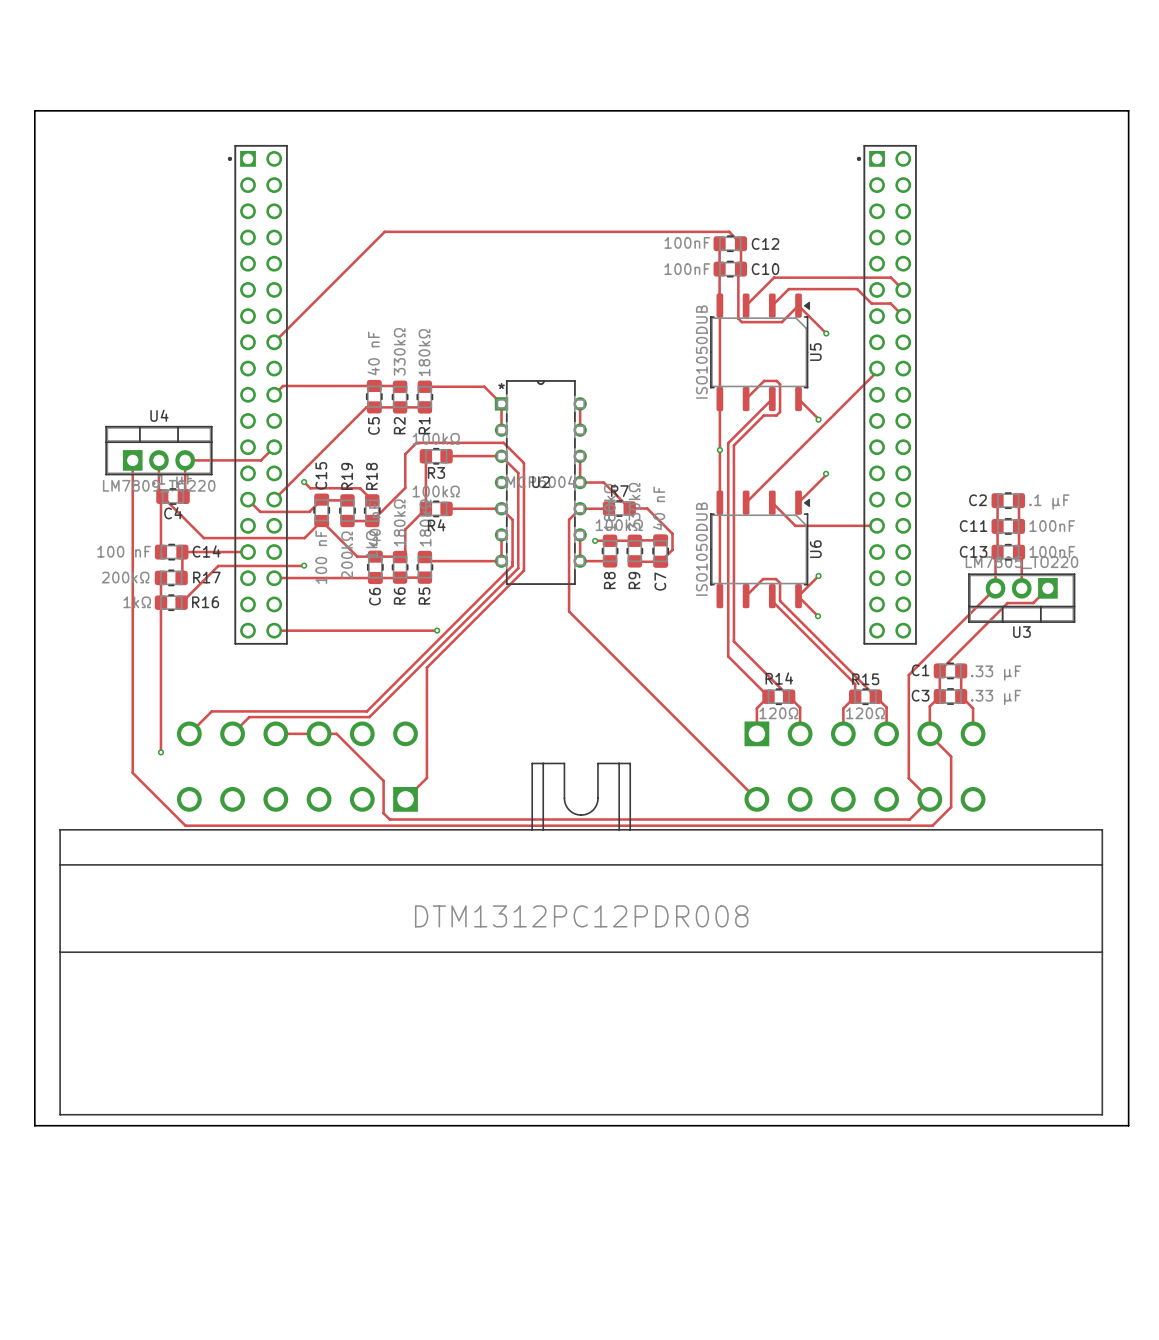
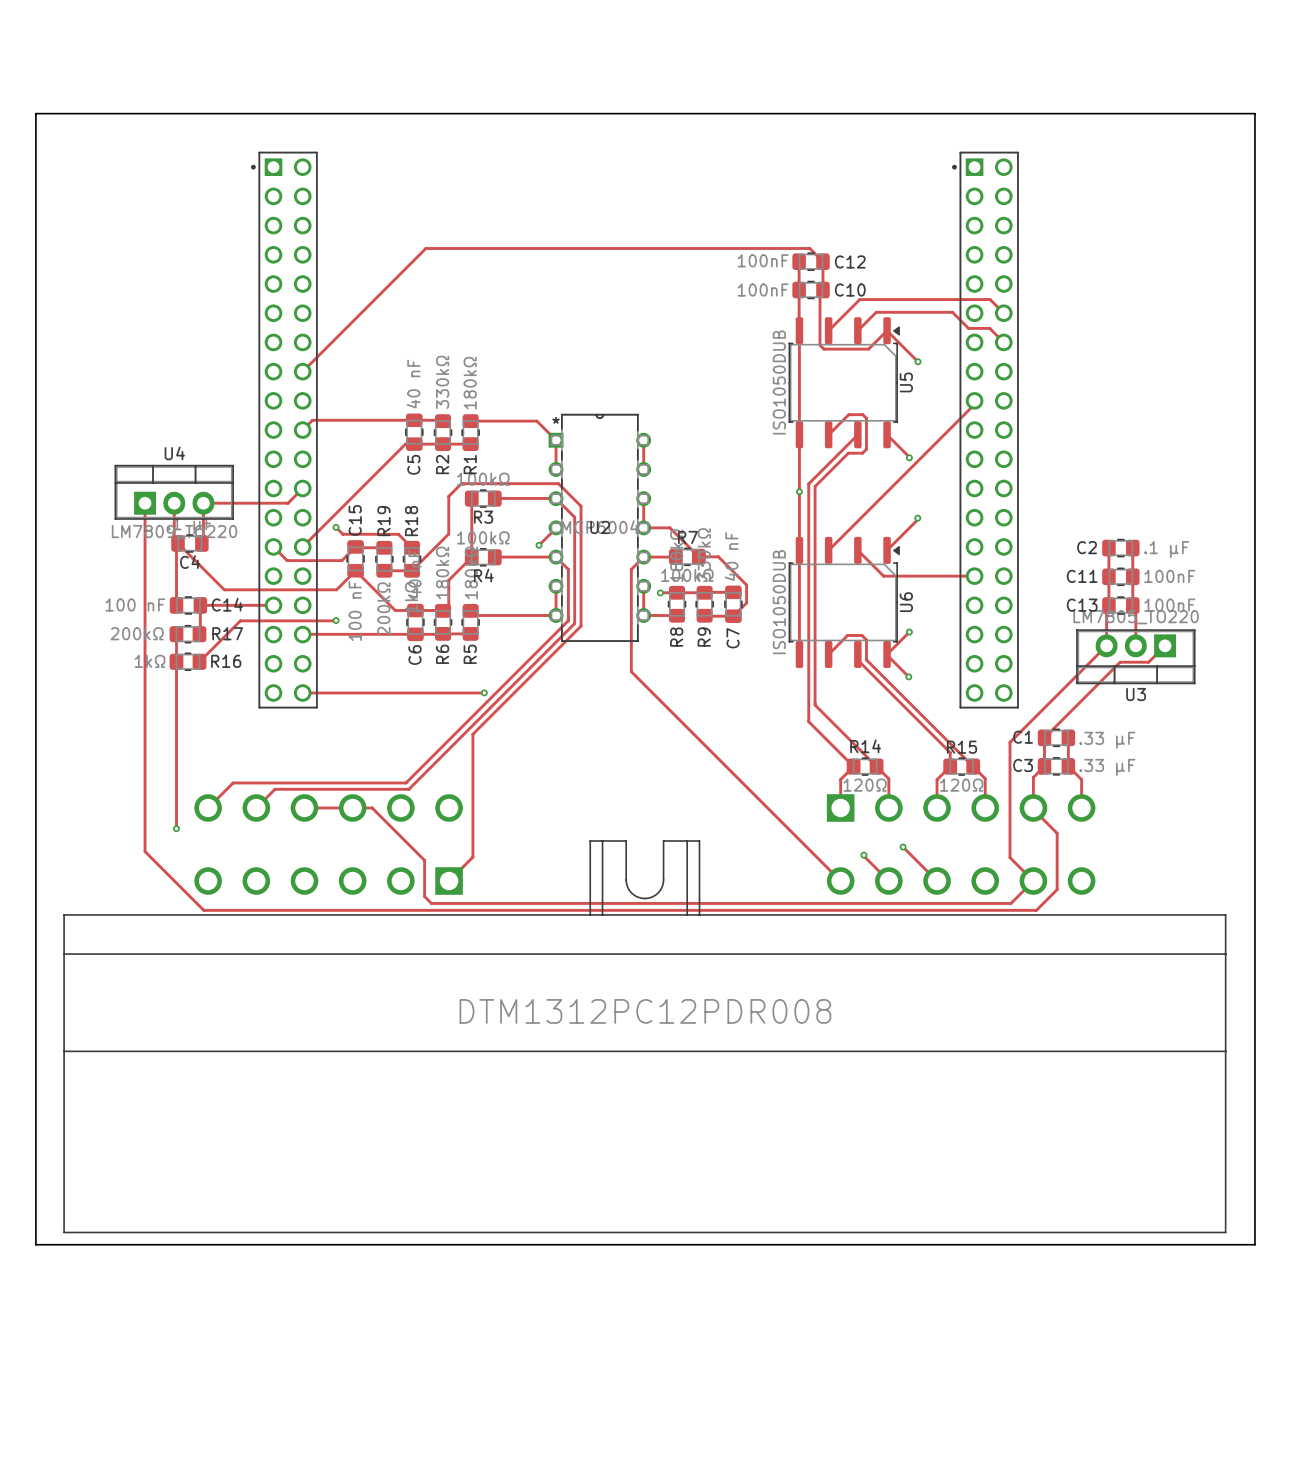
track: none -> (556, 528) (539, 545)
via: none -> (539, 545)
track: none -> (903, 847) (937, 881)
via: none -> (903, 847)
track: none -> (863, 855) (888, 881)
via: none -> (863, 855)

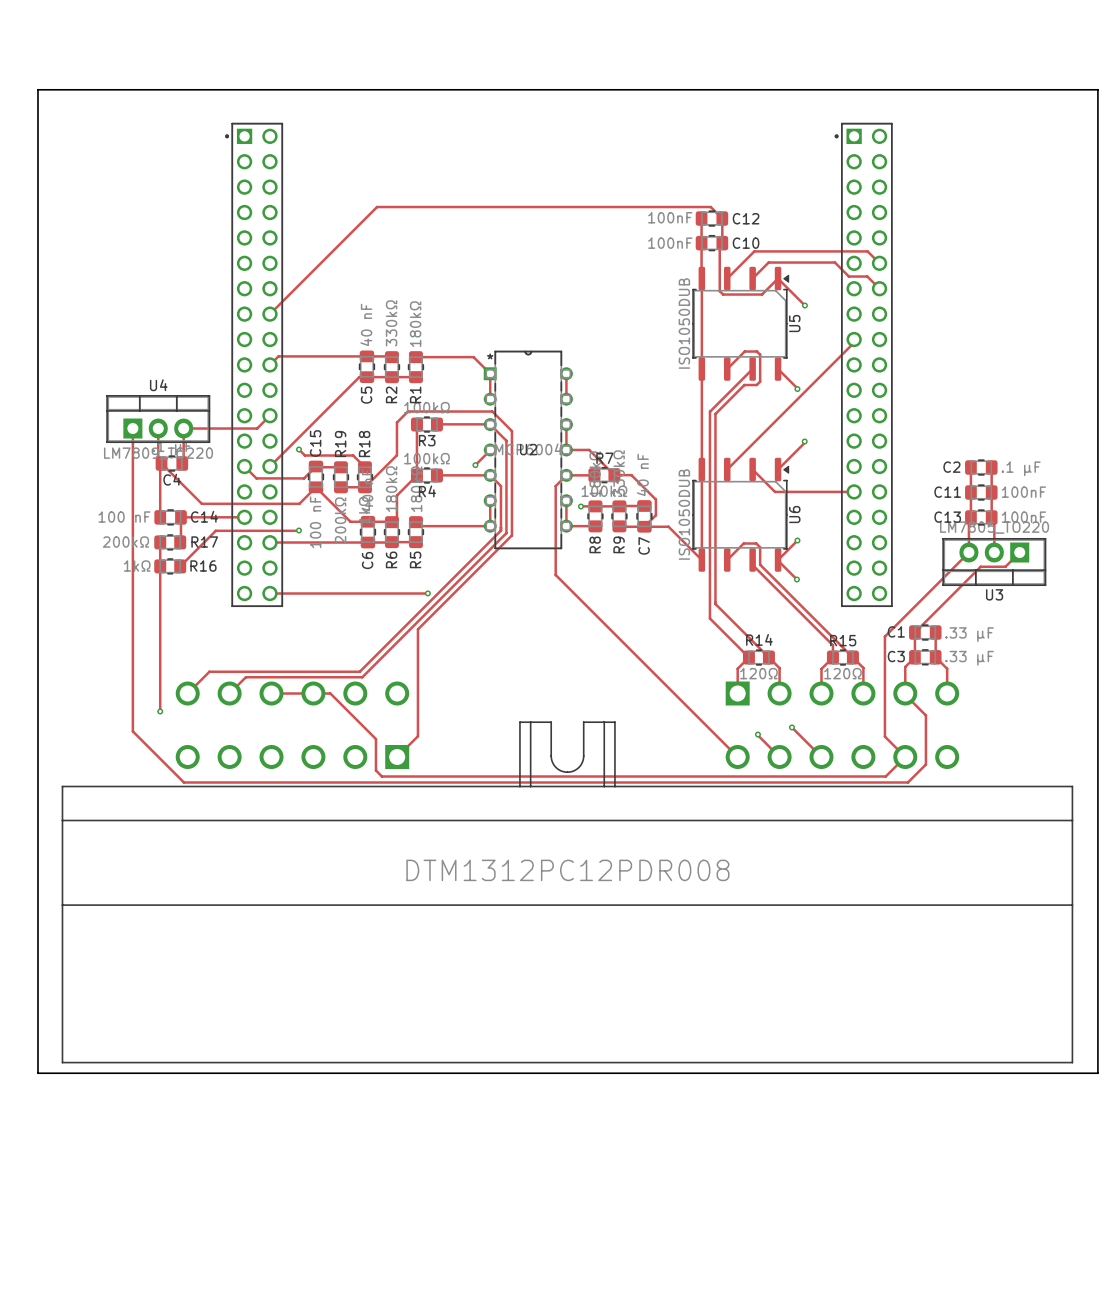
via: (799, 491) -> none
track: none -> (644, 526) (668, 526) (701, 560)

